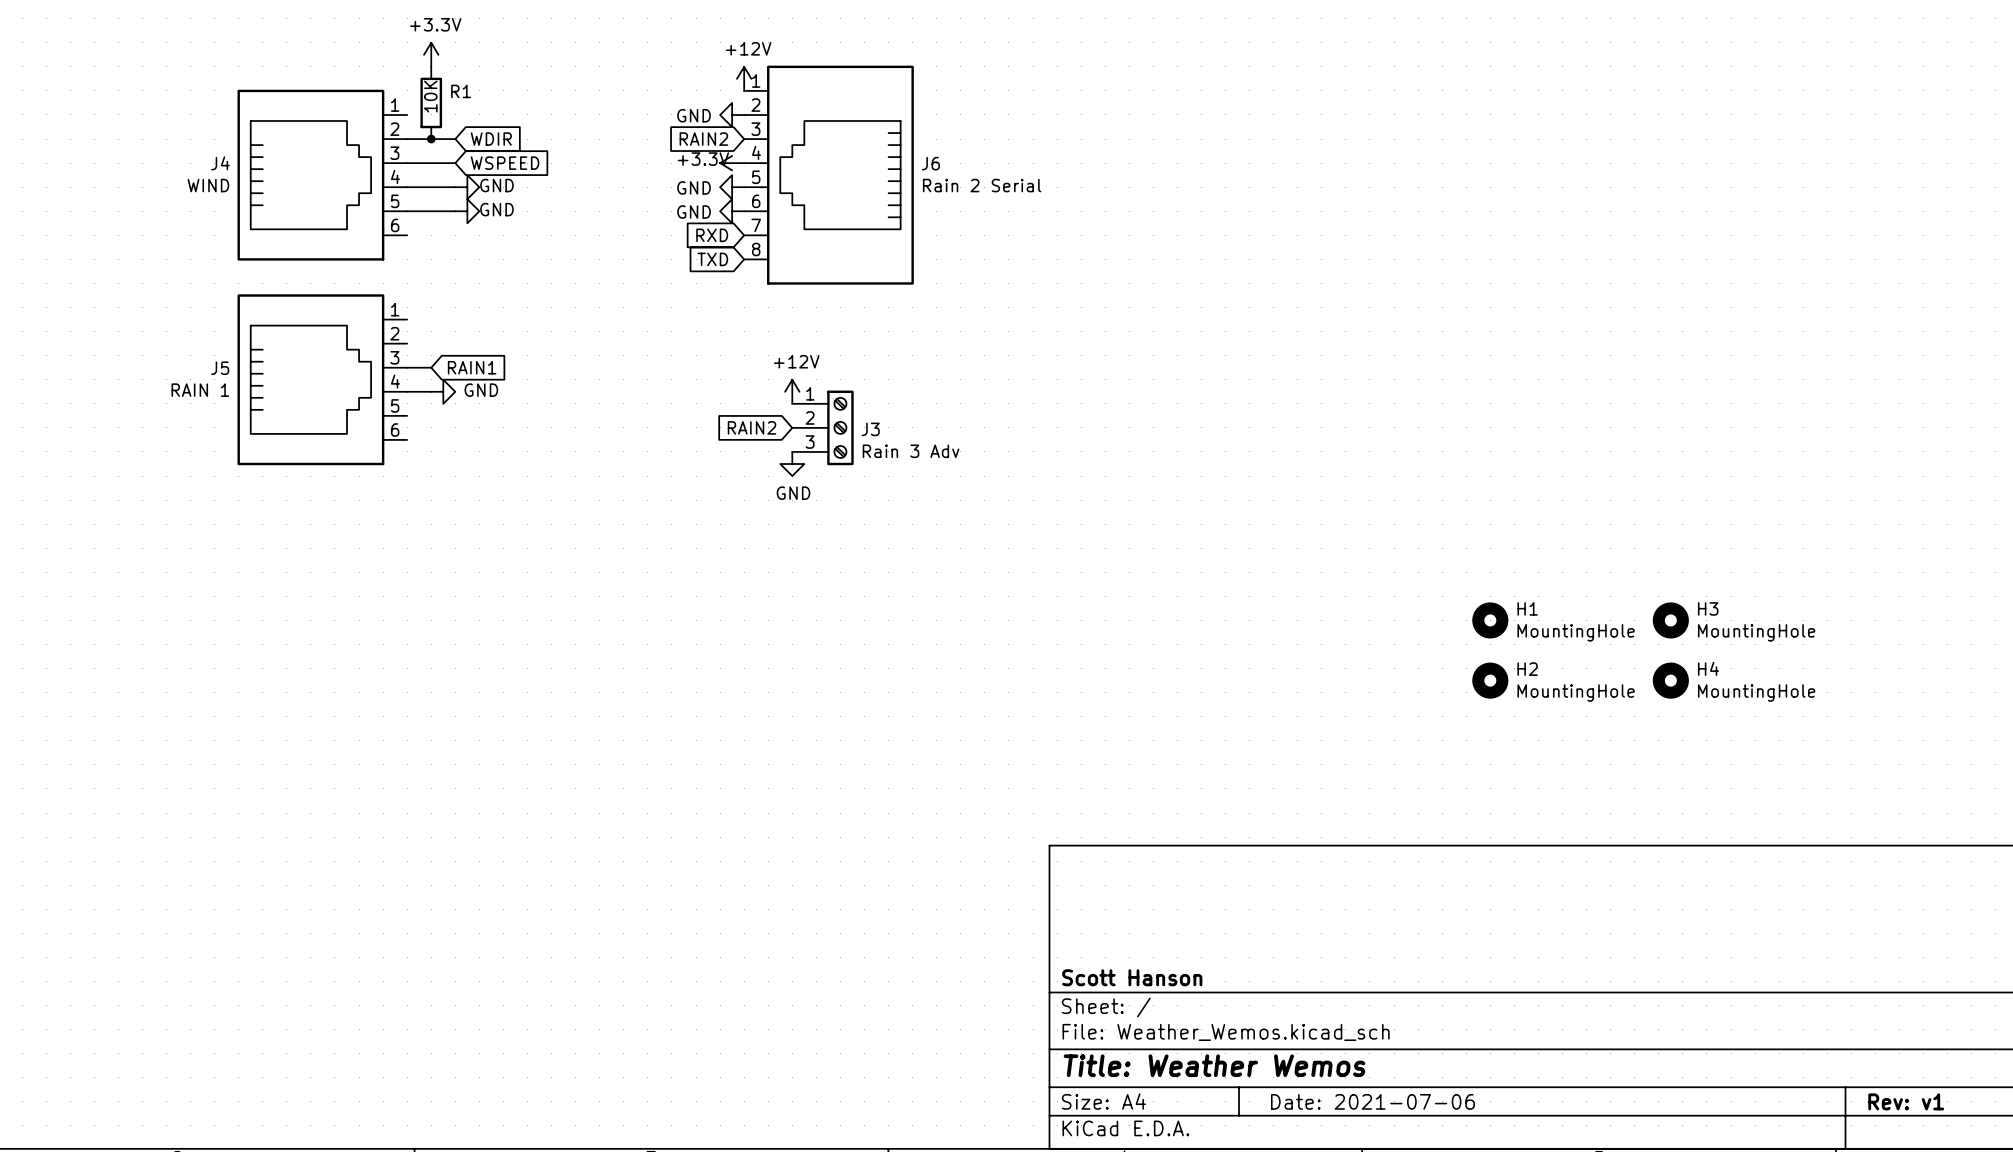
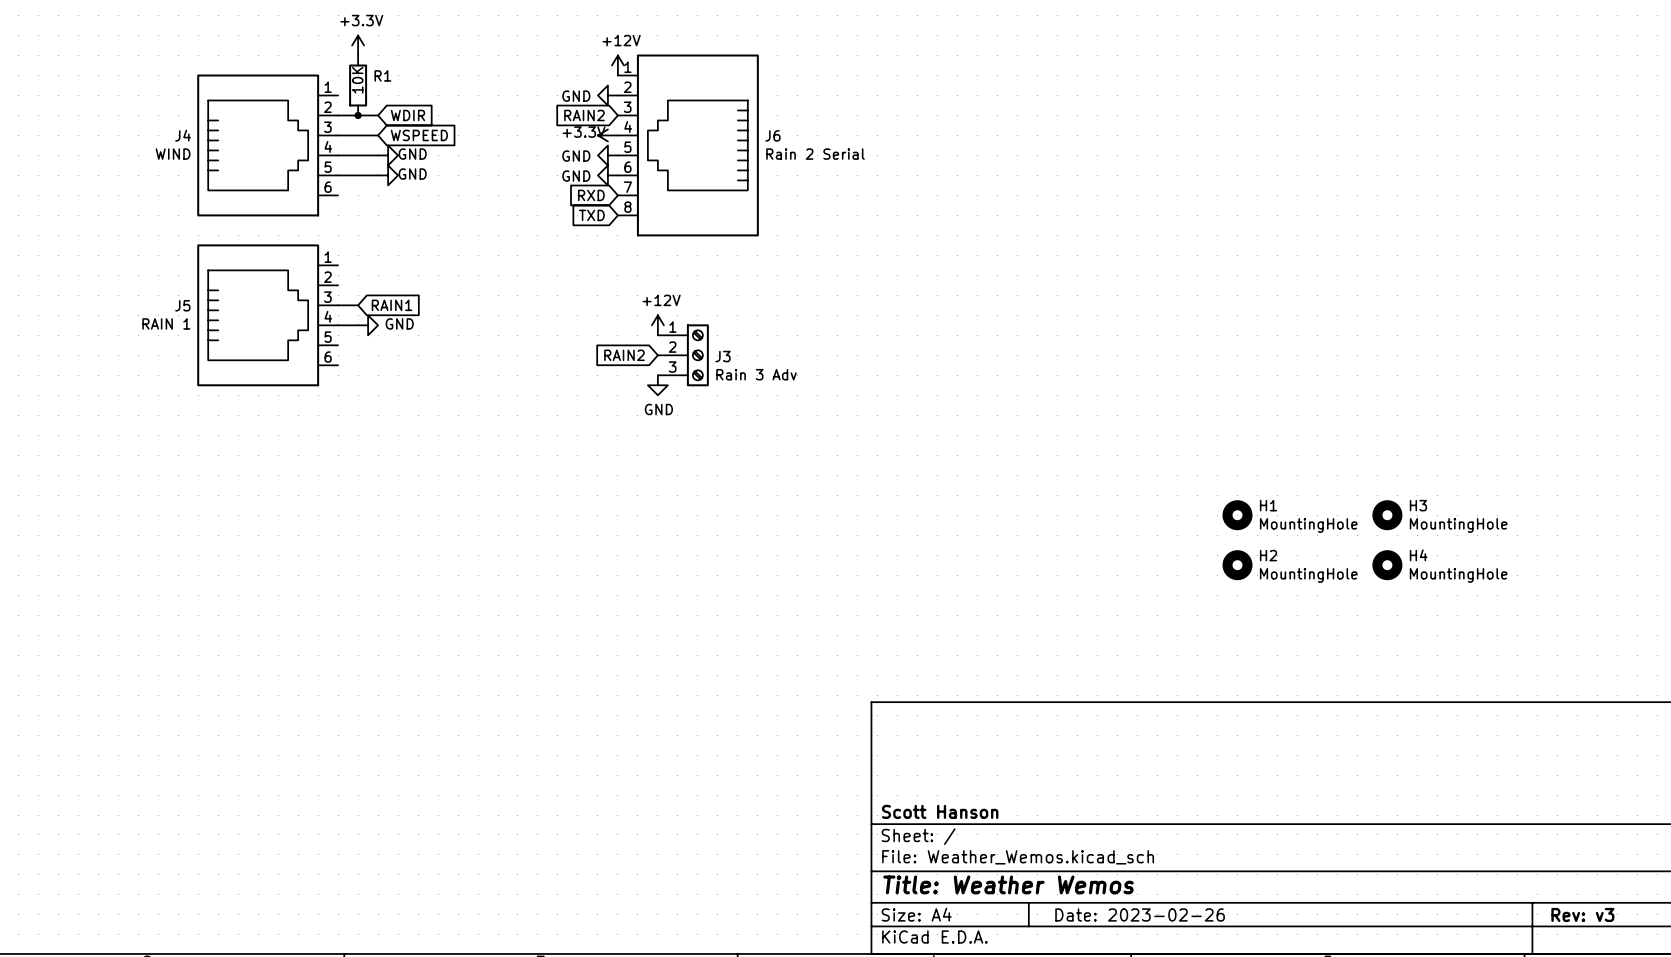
title block: Date: 2021-07-06 (1372, 1101) -> Date: 2023-02-26 (1140, 914)
title block: Rev: v1 (1906, 1101) -> Rev: v3 (1582, 914)

